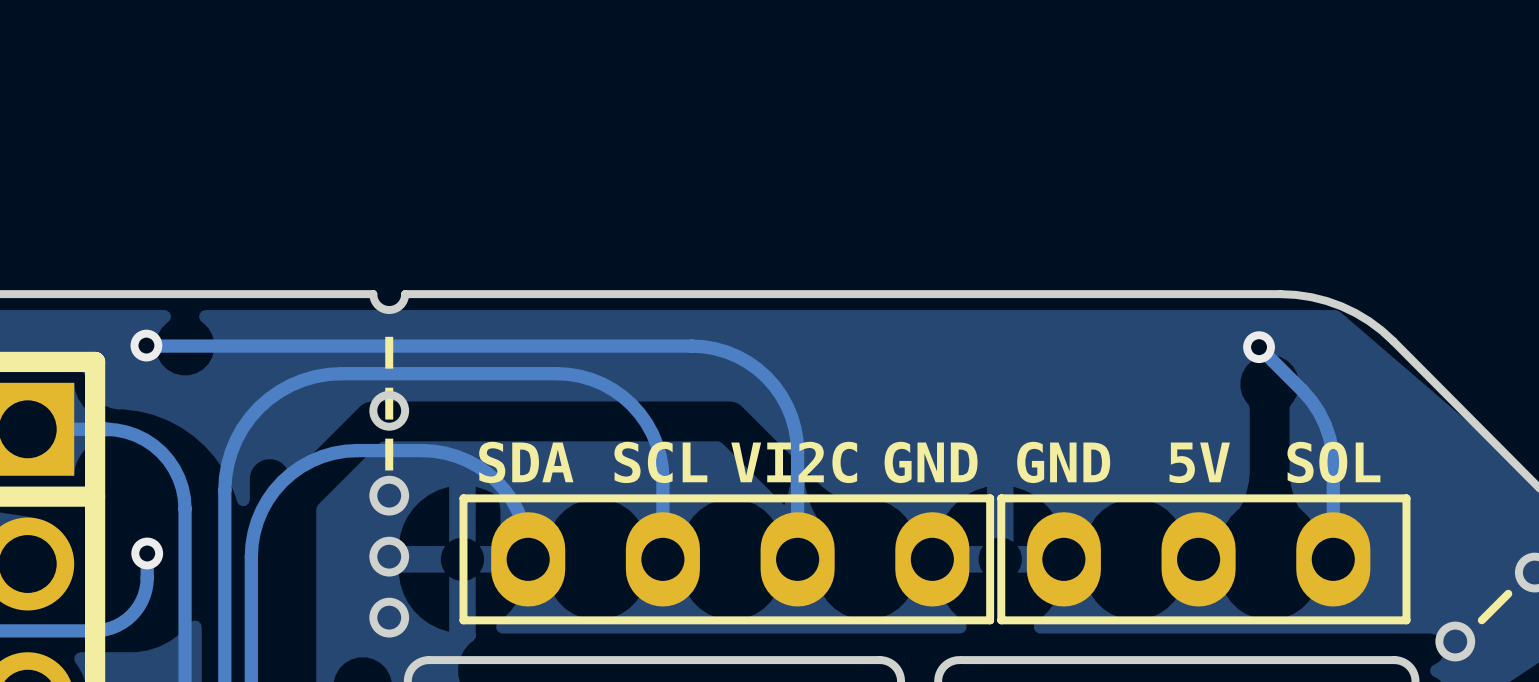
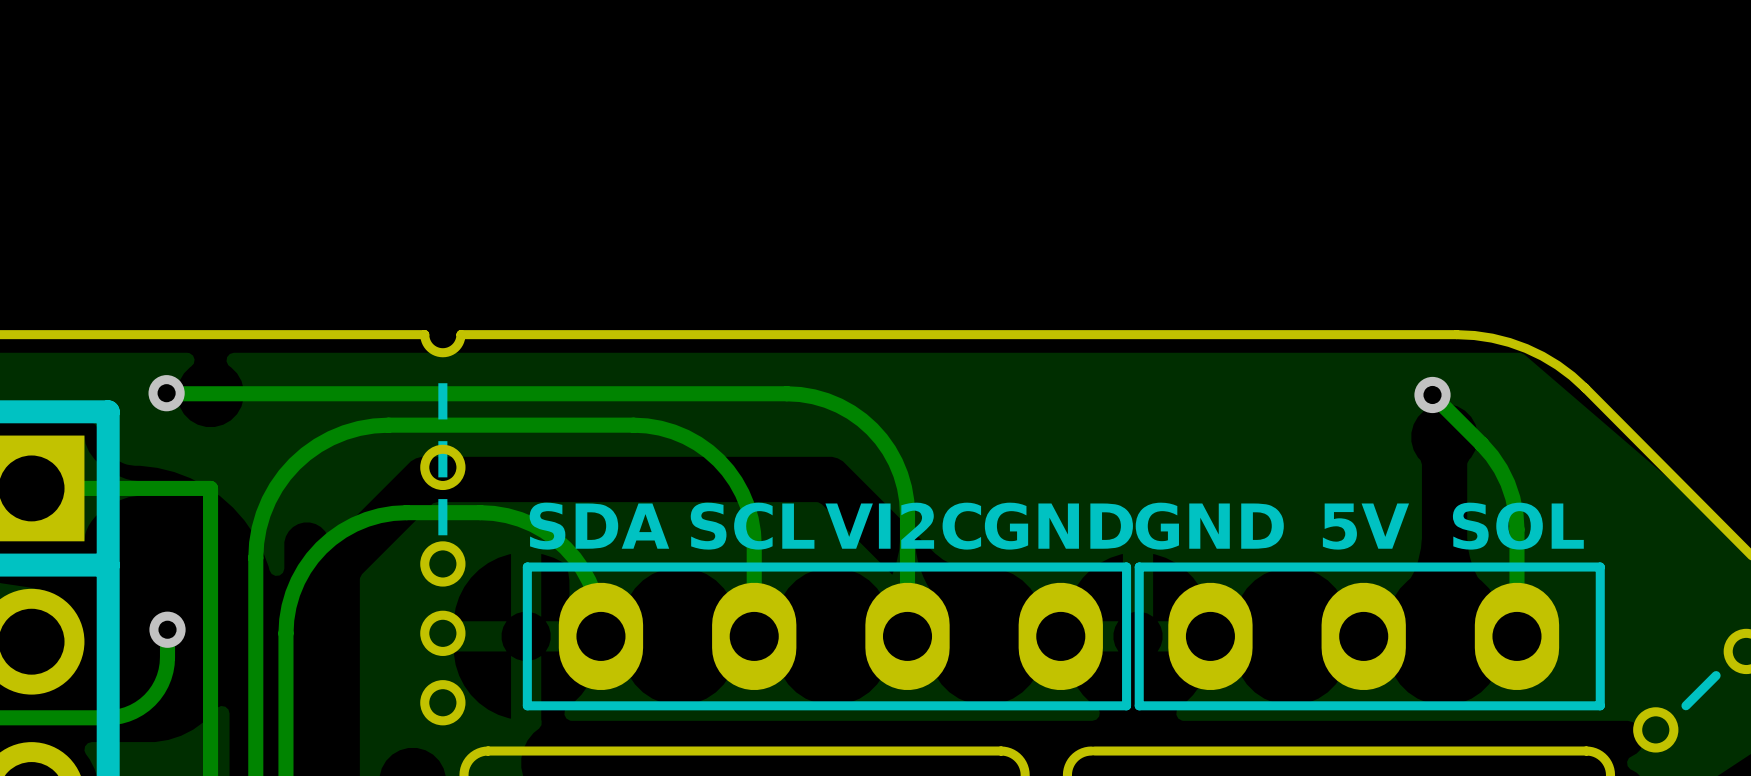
track: (105, 429) (135, 435) (161, 452) (178, 478) (185, 508) -> (120, 488) (210, 488) (210, 578)

